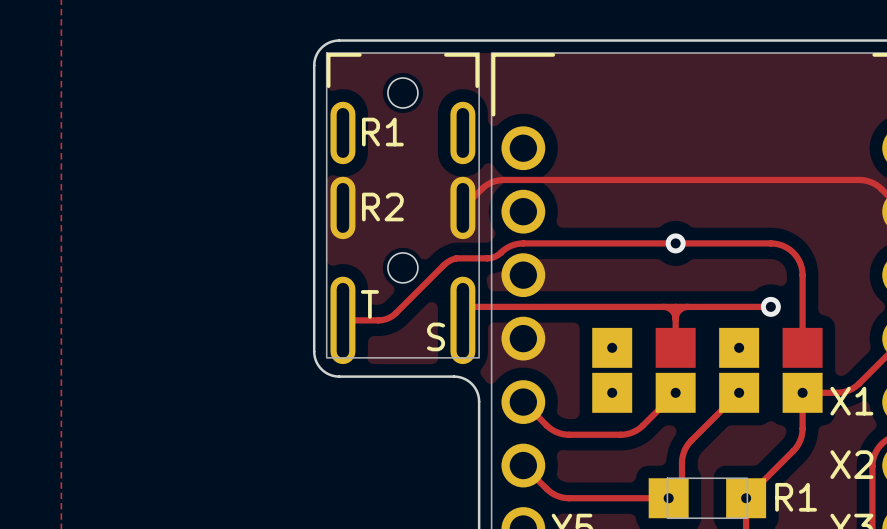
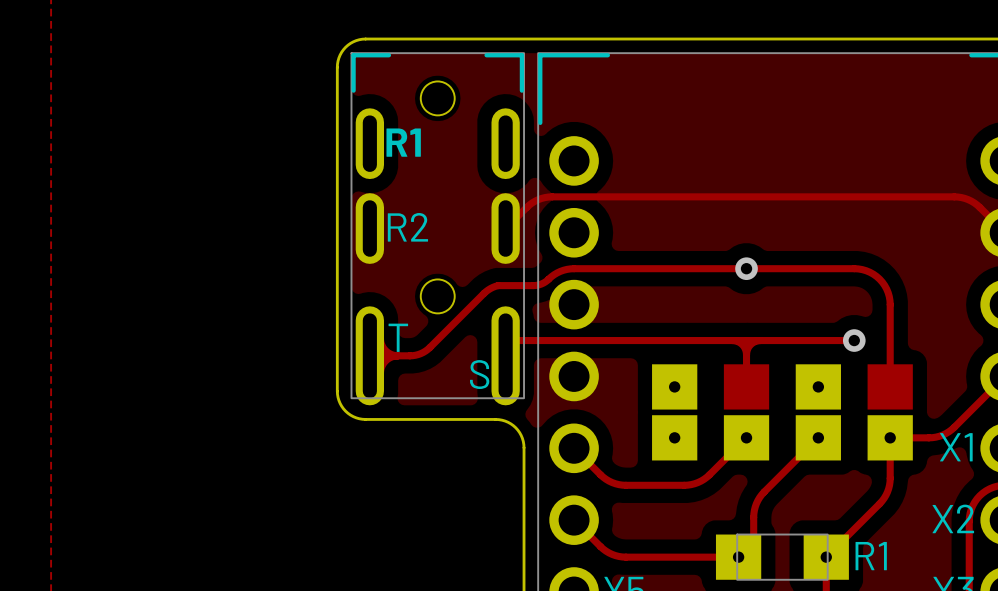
track: none -> (380, 338) (385, 350) (398, 355) (385, 360) (380, 373)

